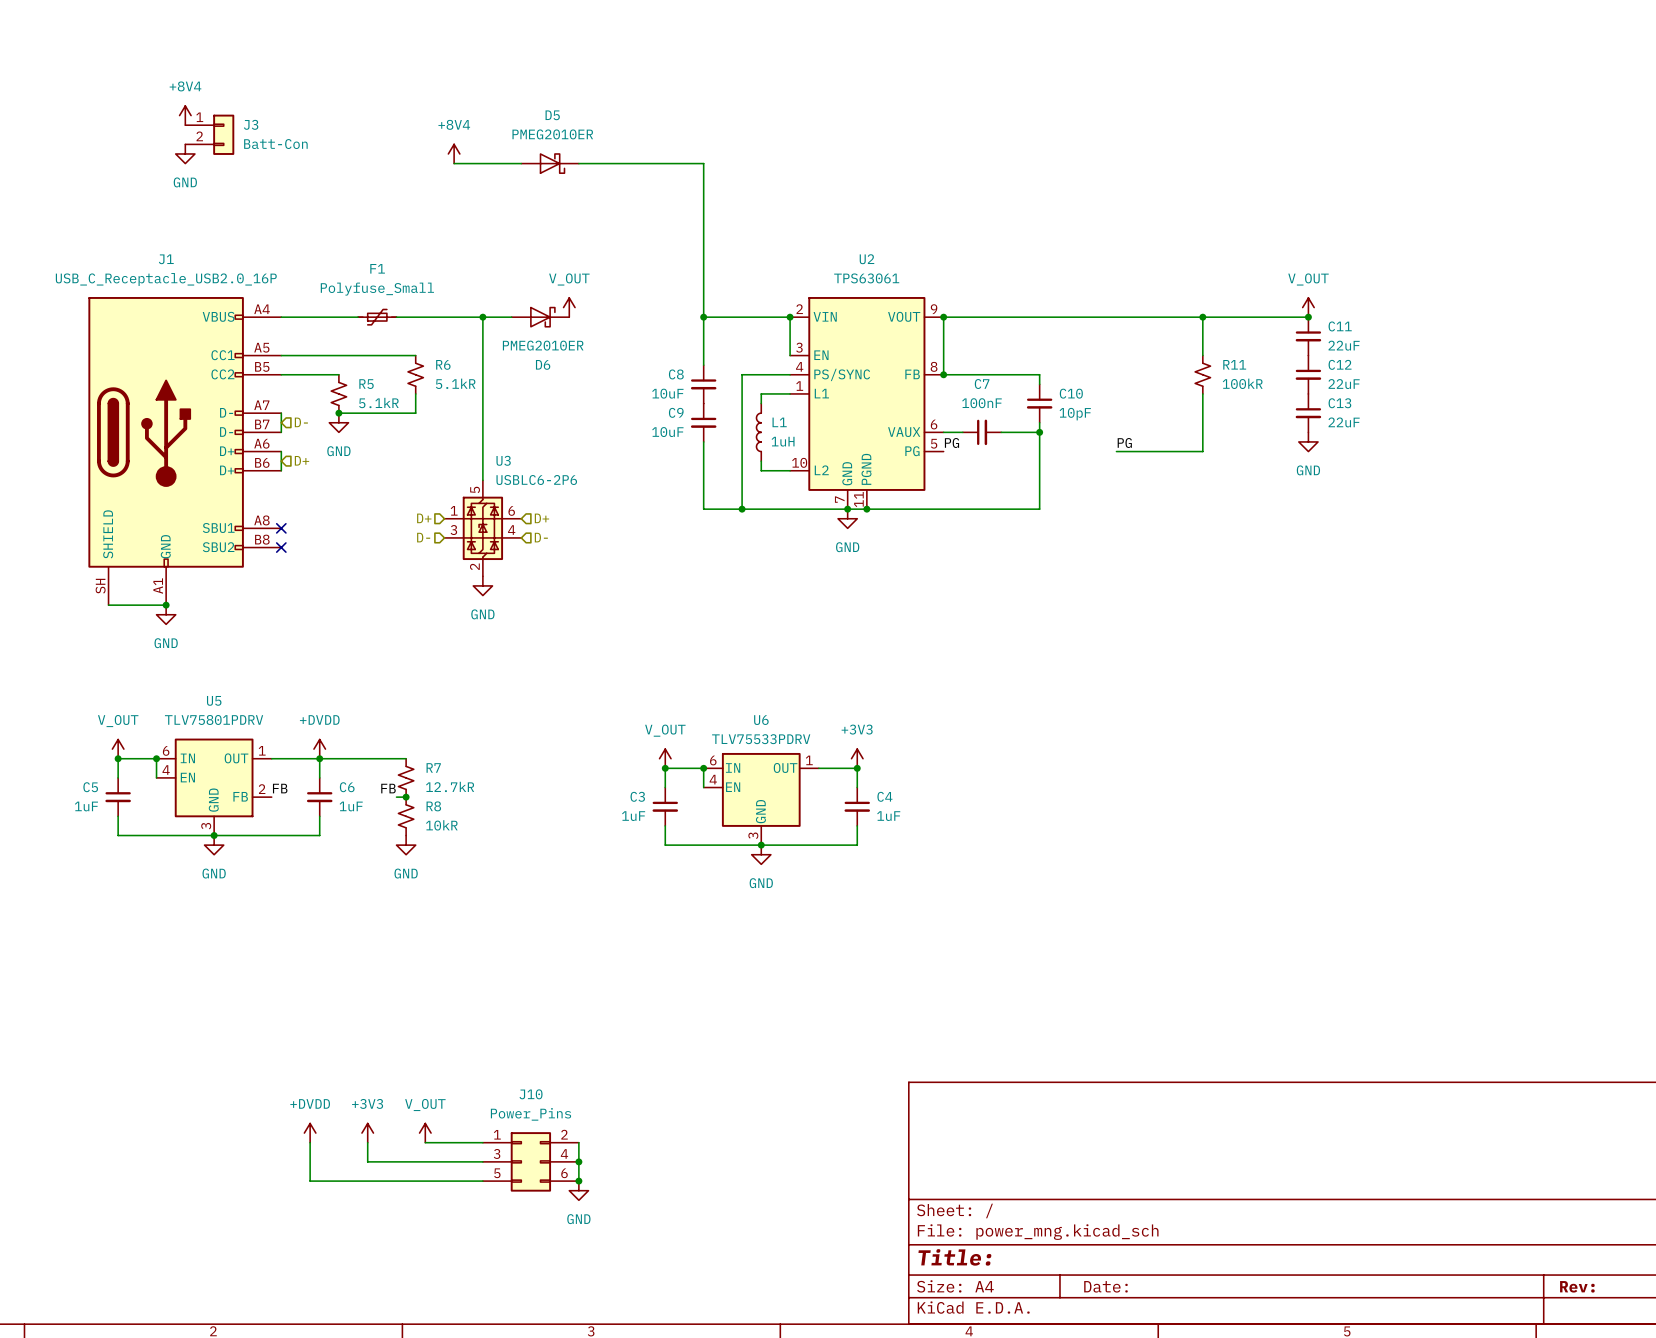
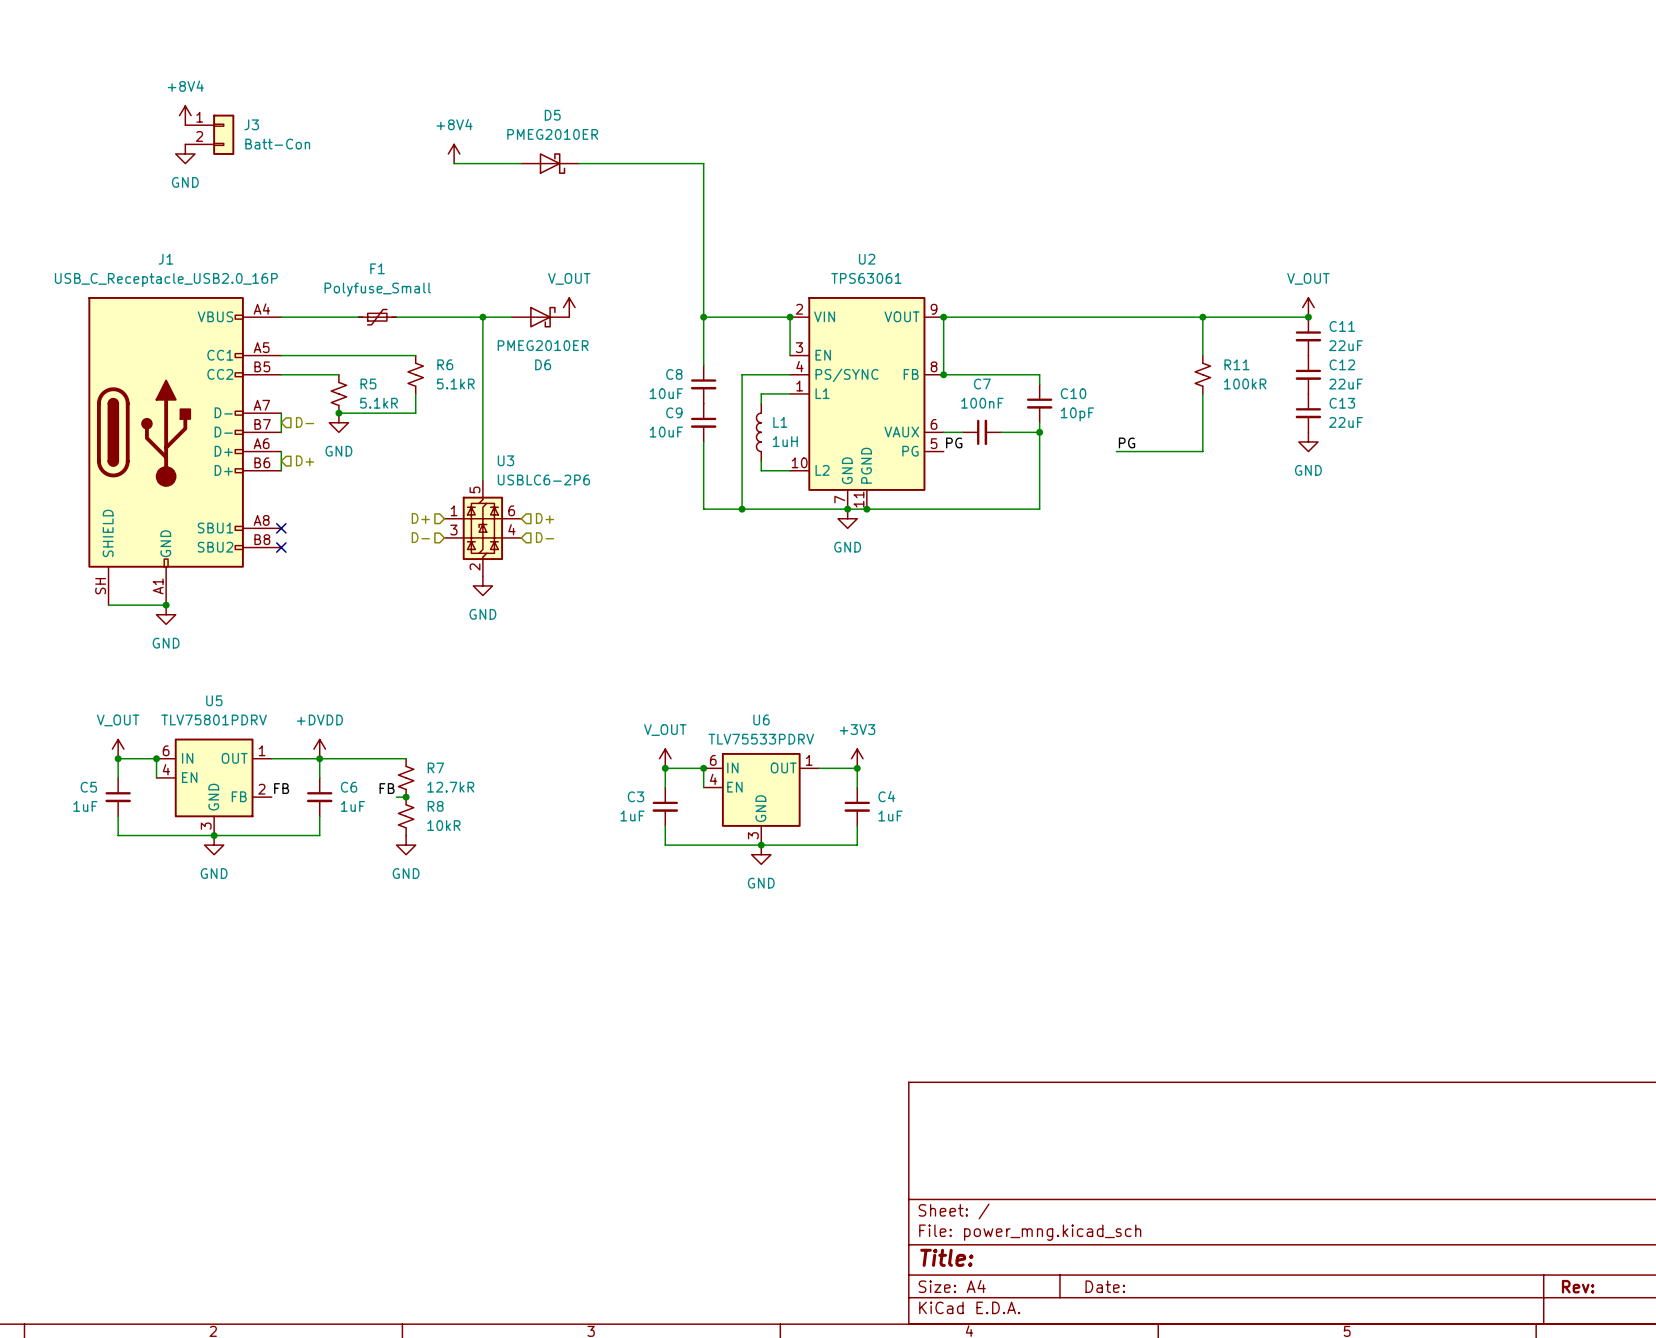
power symbol: +DVDD (310, 1133) -> none
power symbol: +3V3 (367, 1133) -> none
power symbol: V_OUT (425, 1133) -> none
wire: (310, 1142) (310, 1181) (482, 1181) -> none
wire: (367, 1142) (367, 1161) (482, 1161) -> none
wire: (425, 1142) (482, 1142) -> none
wire: (578, 1142) (578, 1181) -> none
J10: Power_Pins (530, 1161) -> none
junction: (578, 1161) -> none
junction: (578, 1181) -> none
power symbol: GND (578, 1190) -> none

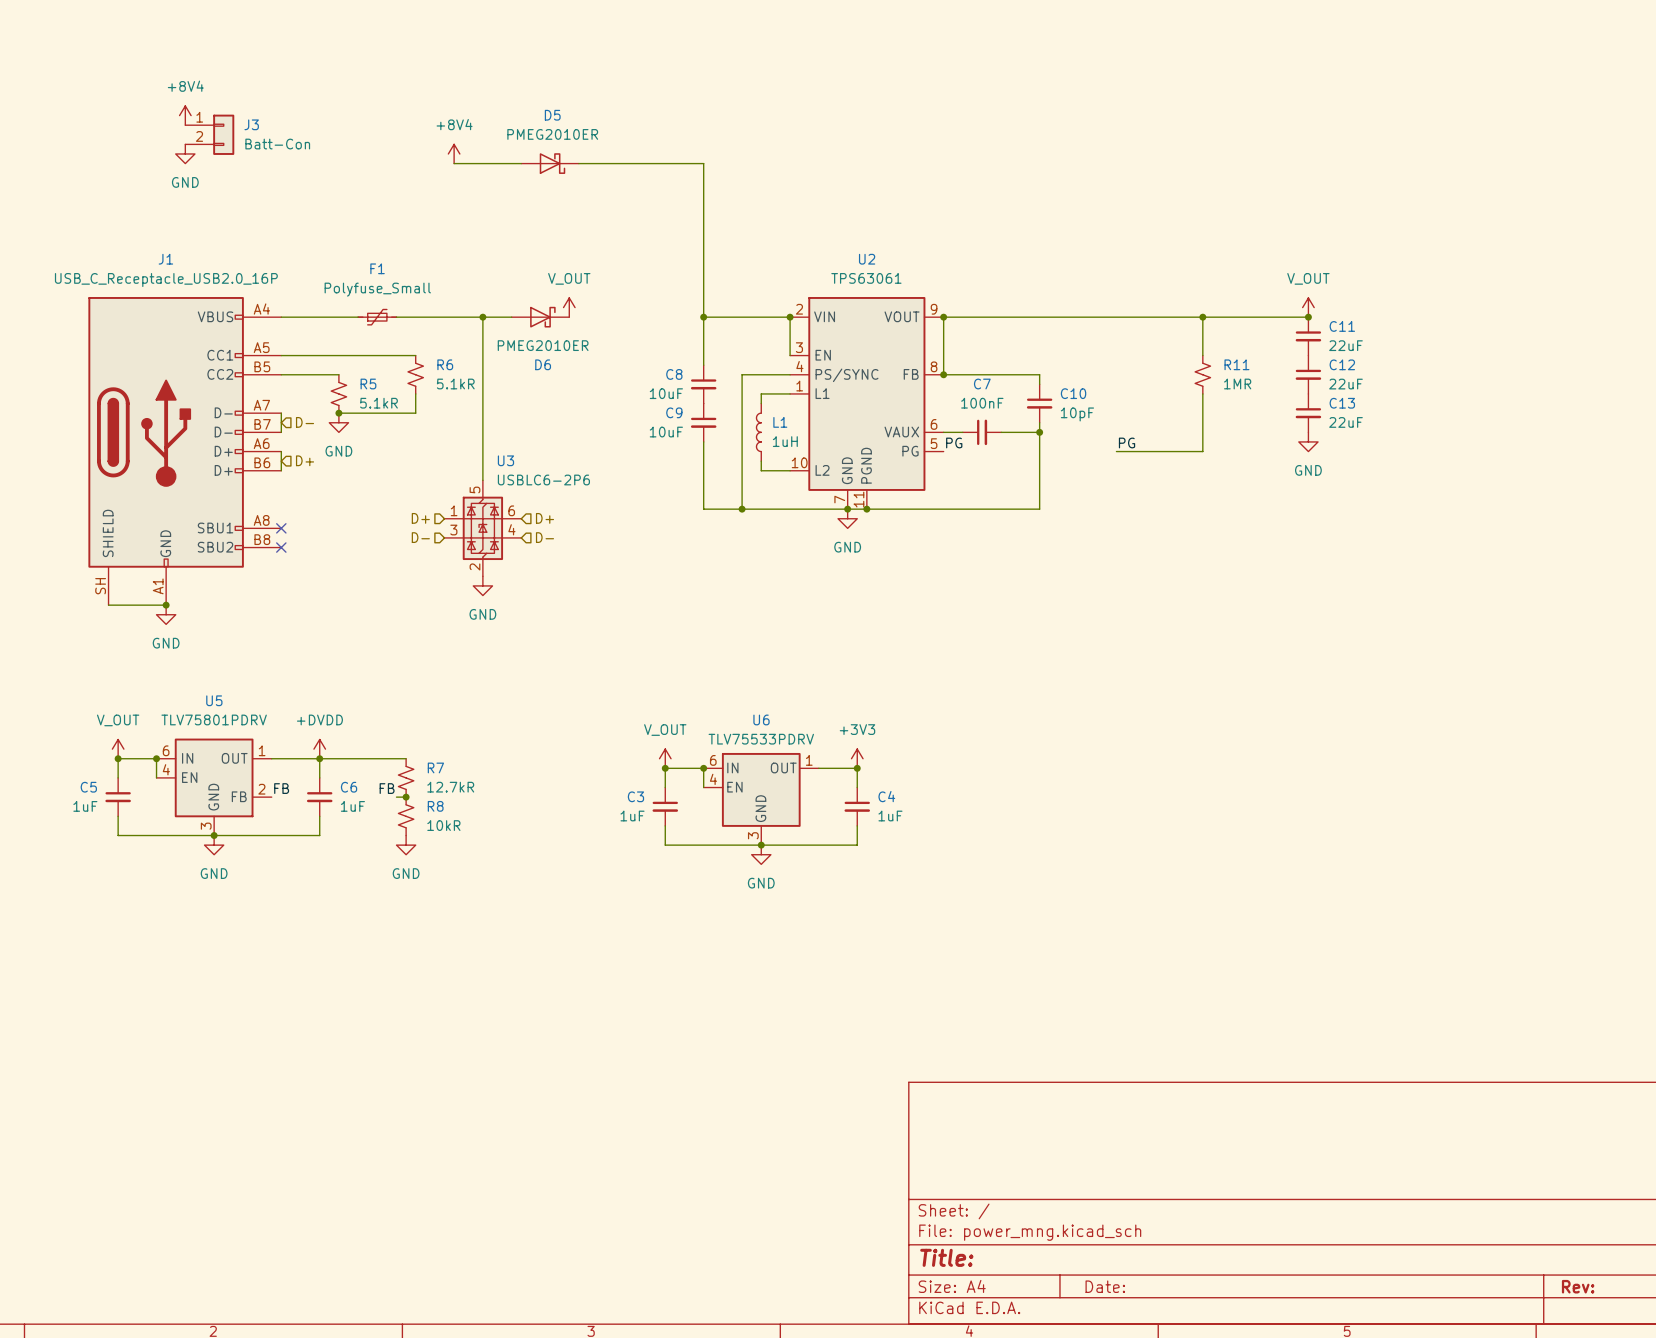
R11 value: 100kR (1245, 384) -> 1MR (1237, 384)

